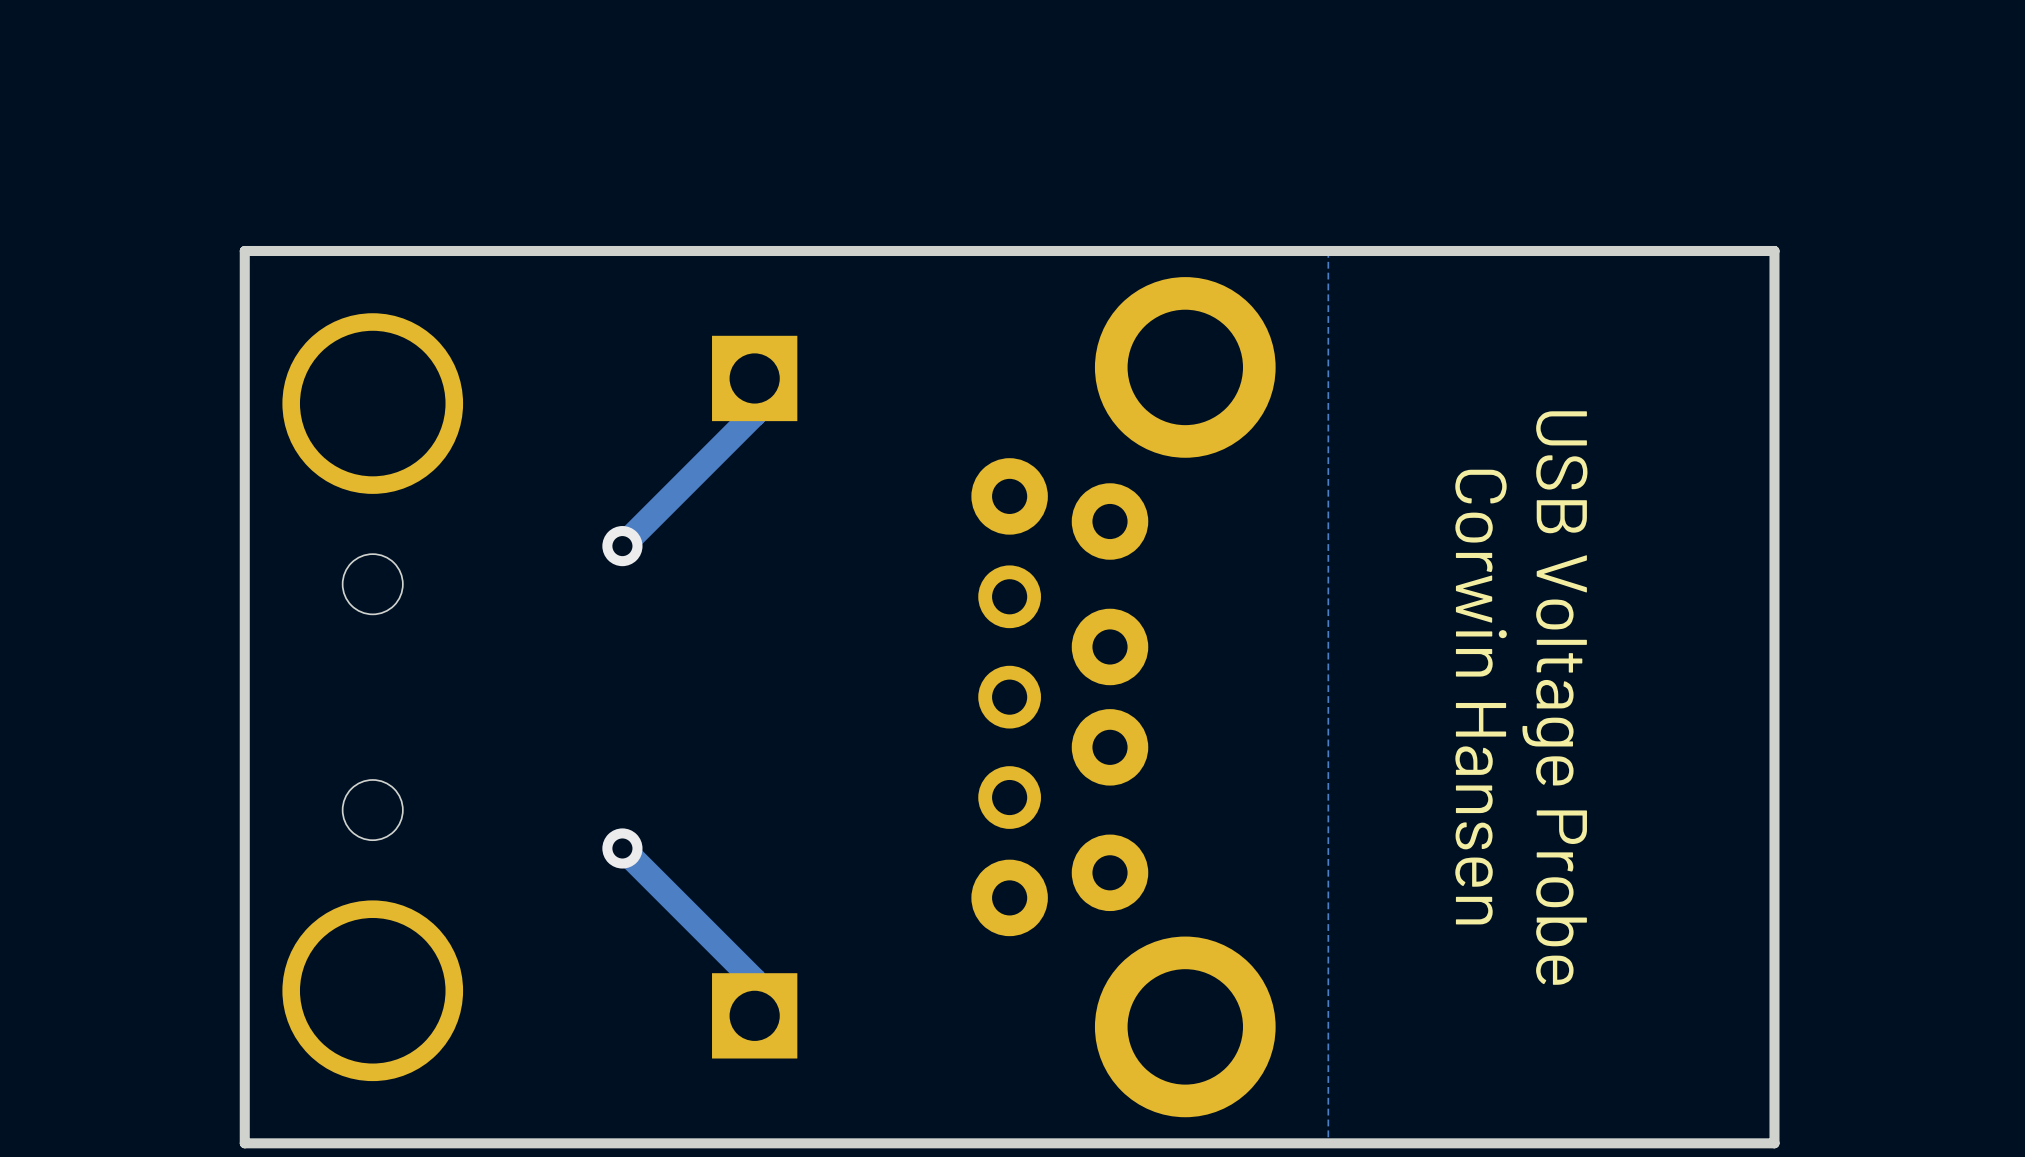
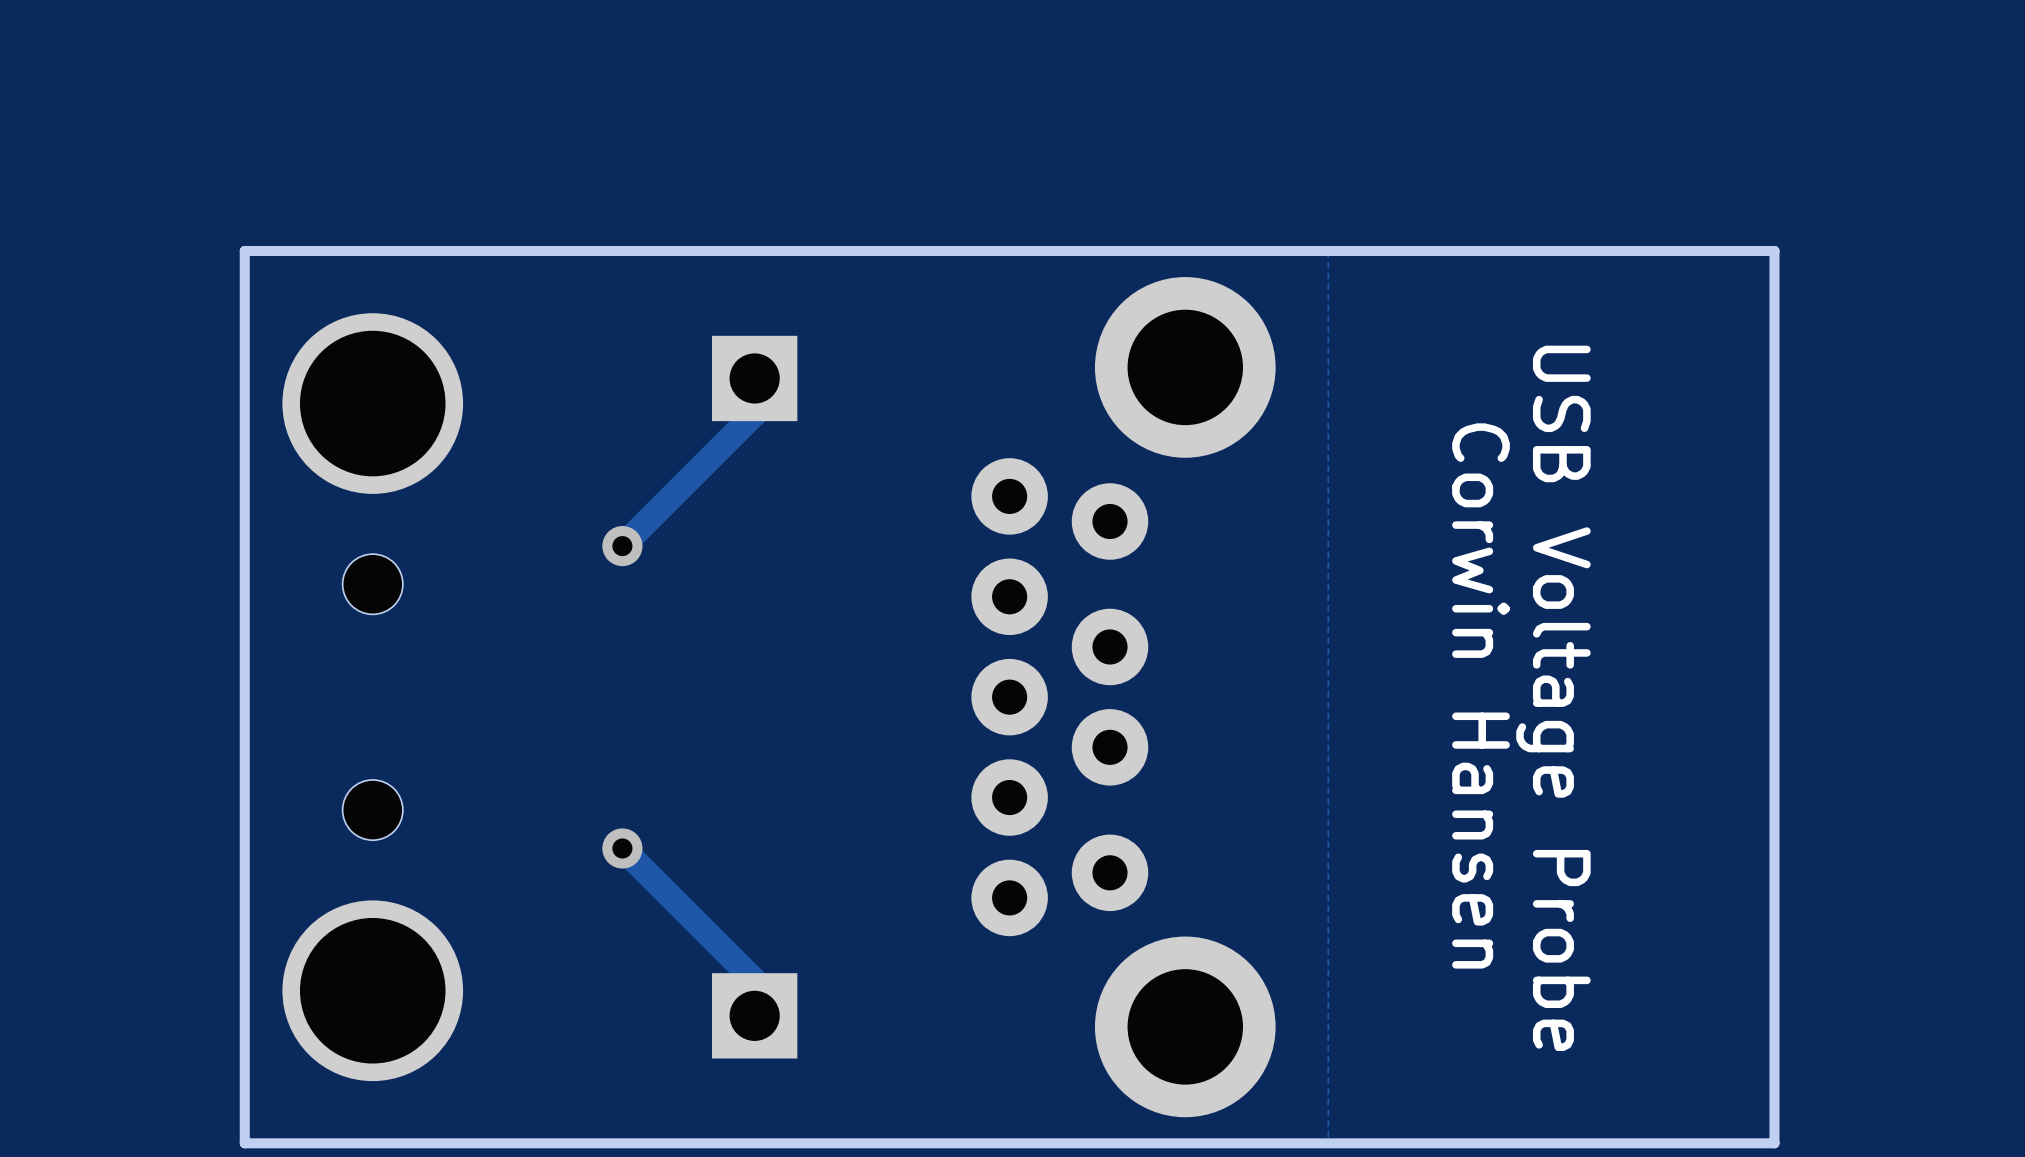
part footprint: [971, 277, 1276, 1118] -> [971, 277, 1276, 1118]

